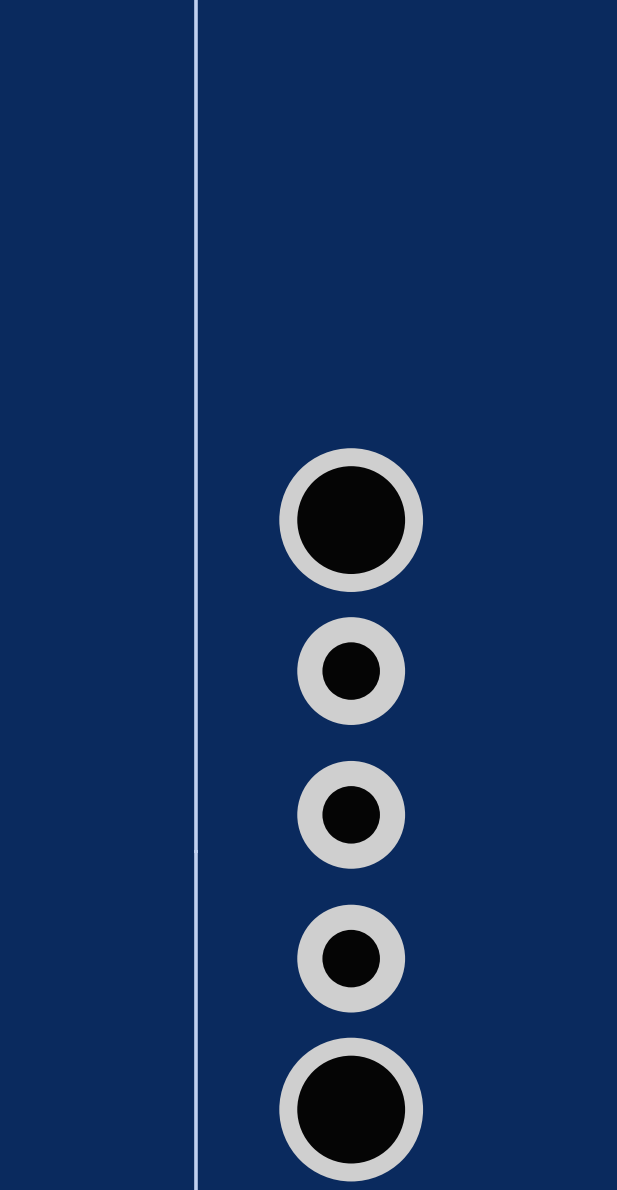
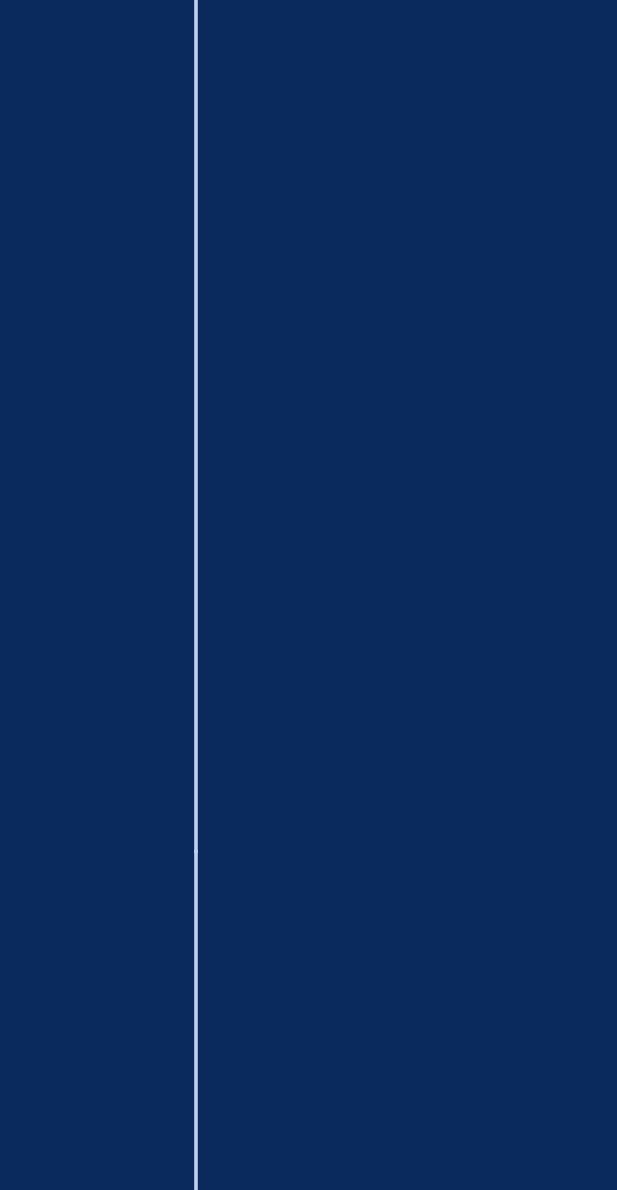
part: (351, 814) -> none

